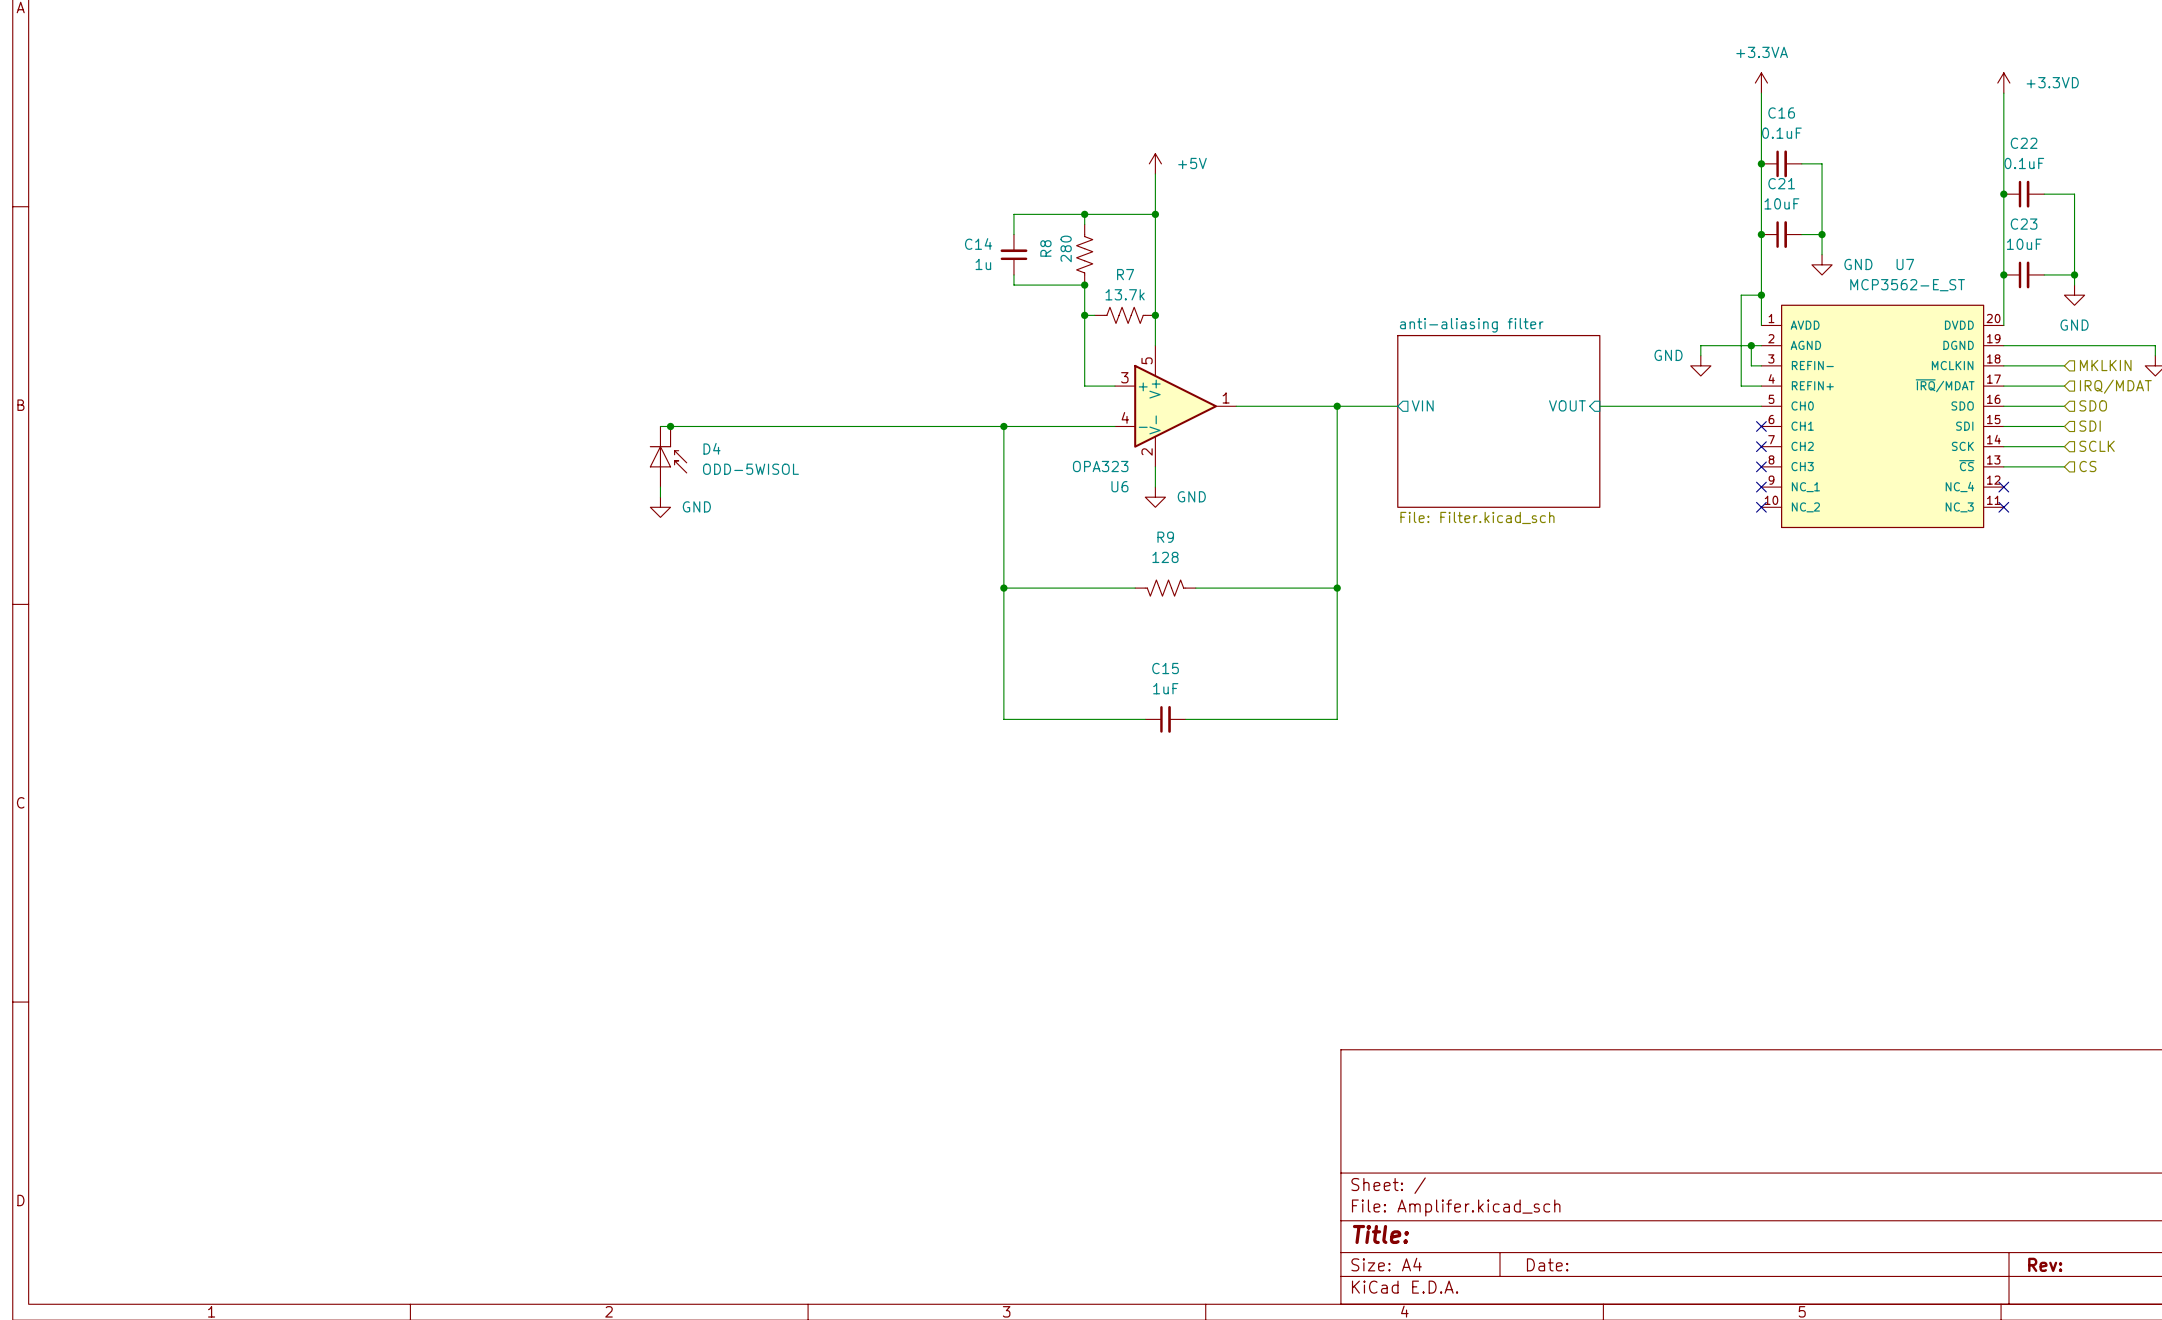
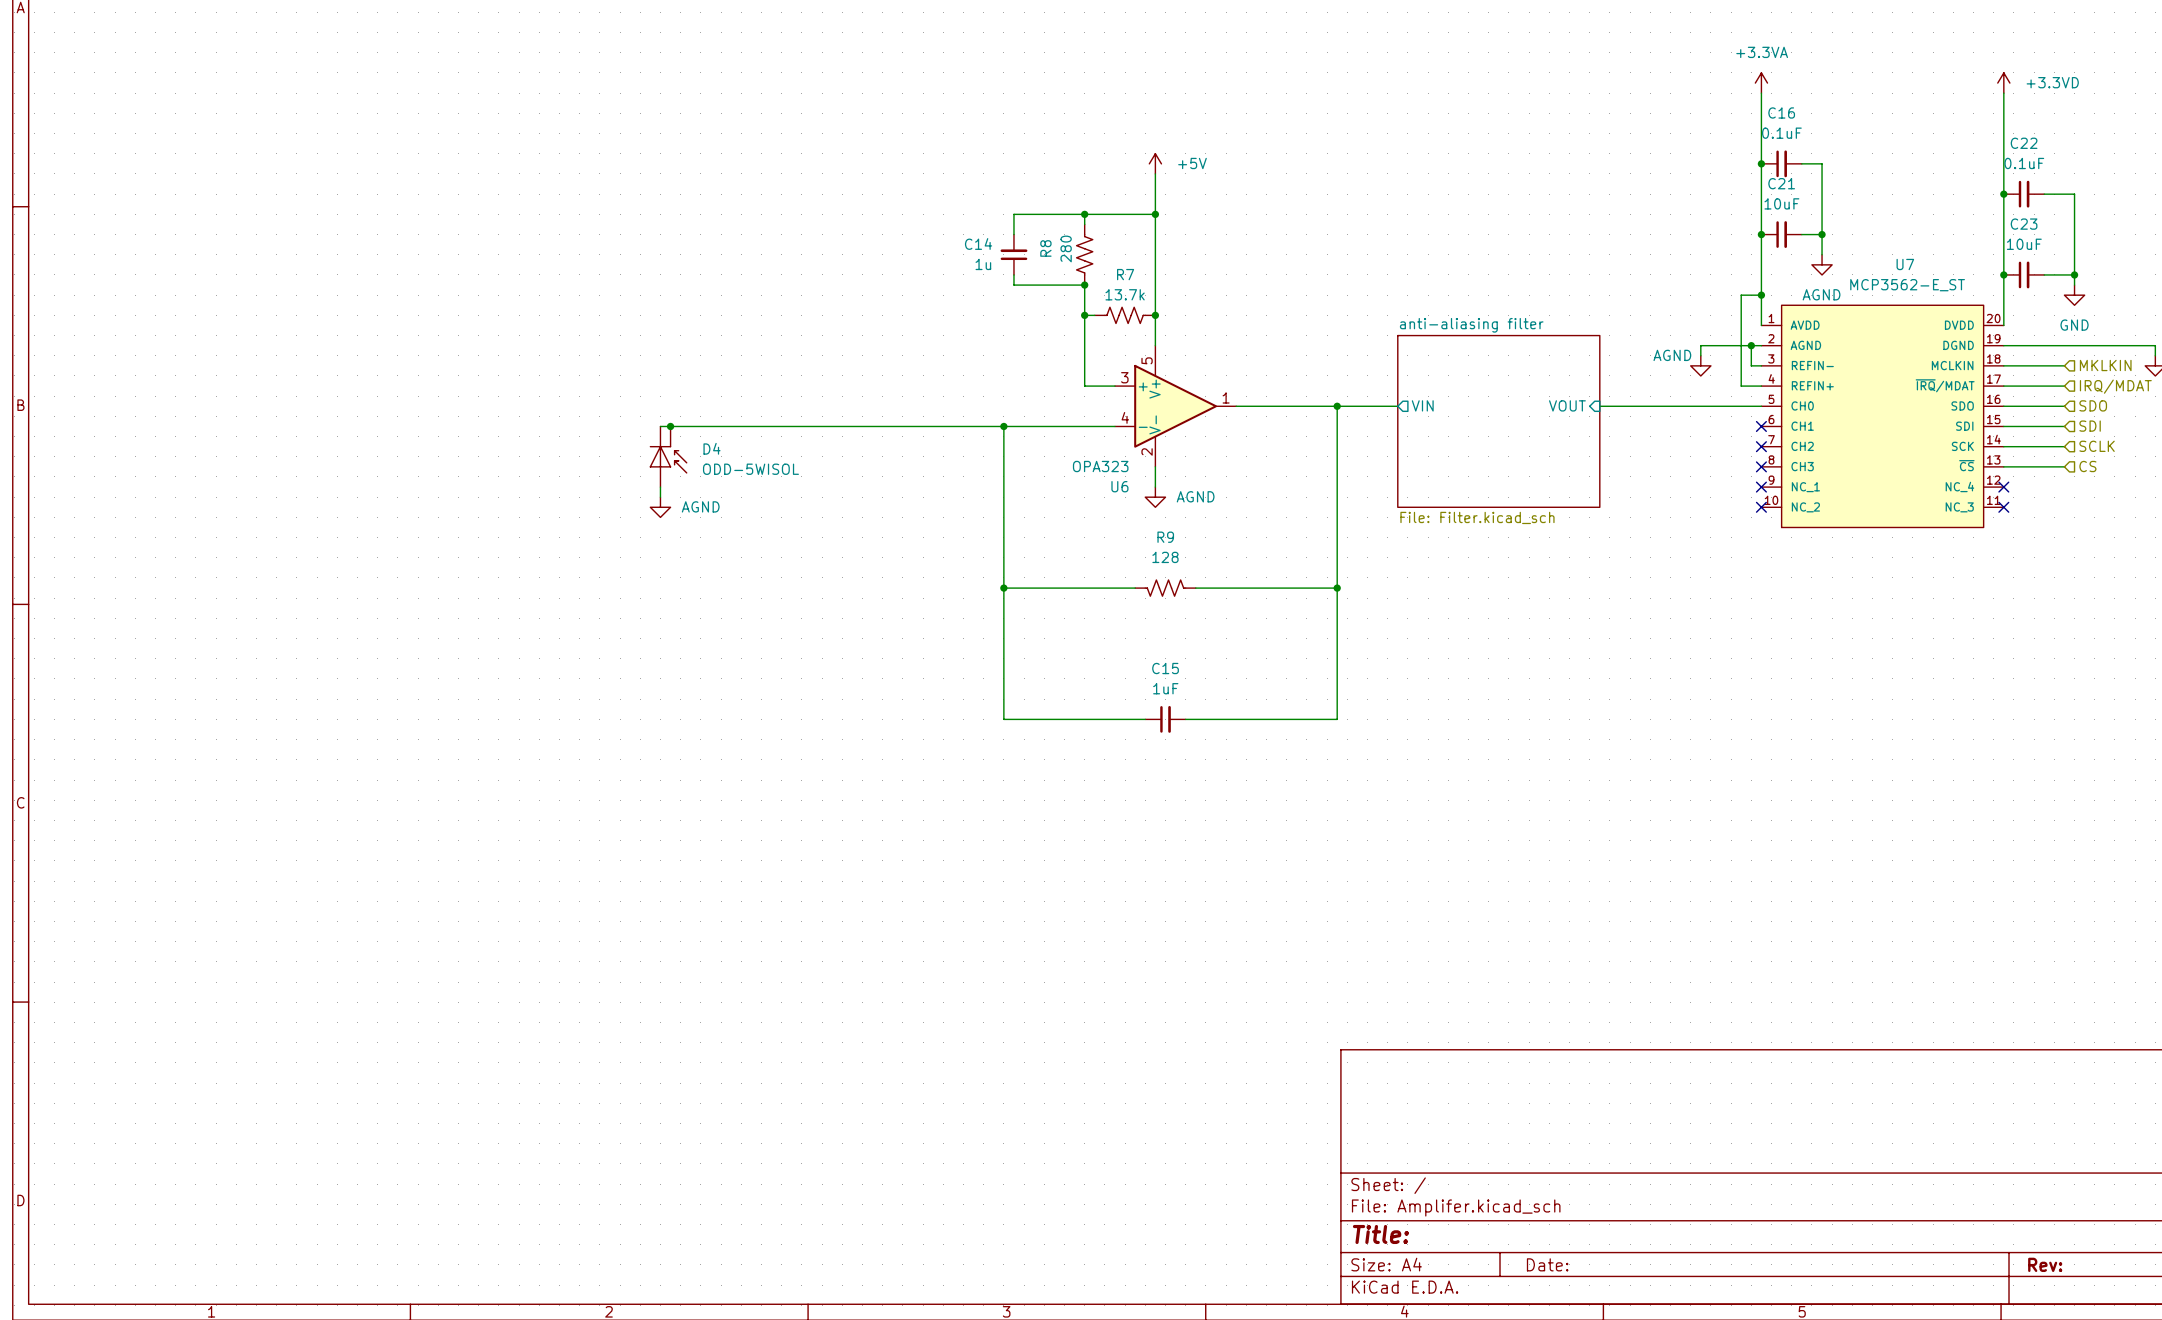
power symbol: GND (1822, 264) -> AGND (1822, 264)
power symbol: GND (1700, 365) -> AGND (1700, 365)
power symbol: GND (1155, 497) -> AGND (1155, 497)
power symbol: GND (660, 507) -> AGND (660, 507)

